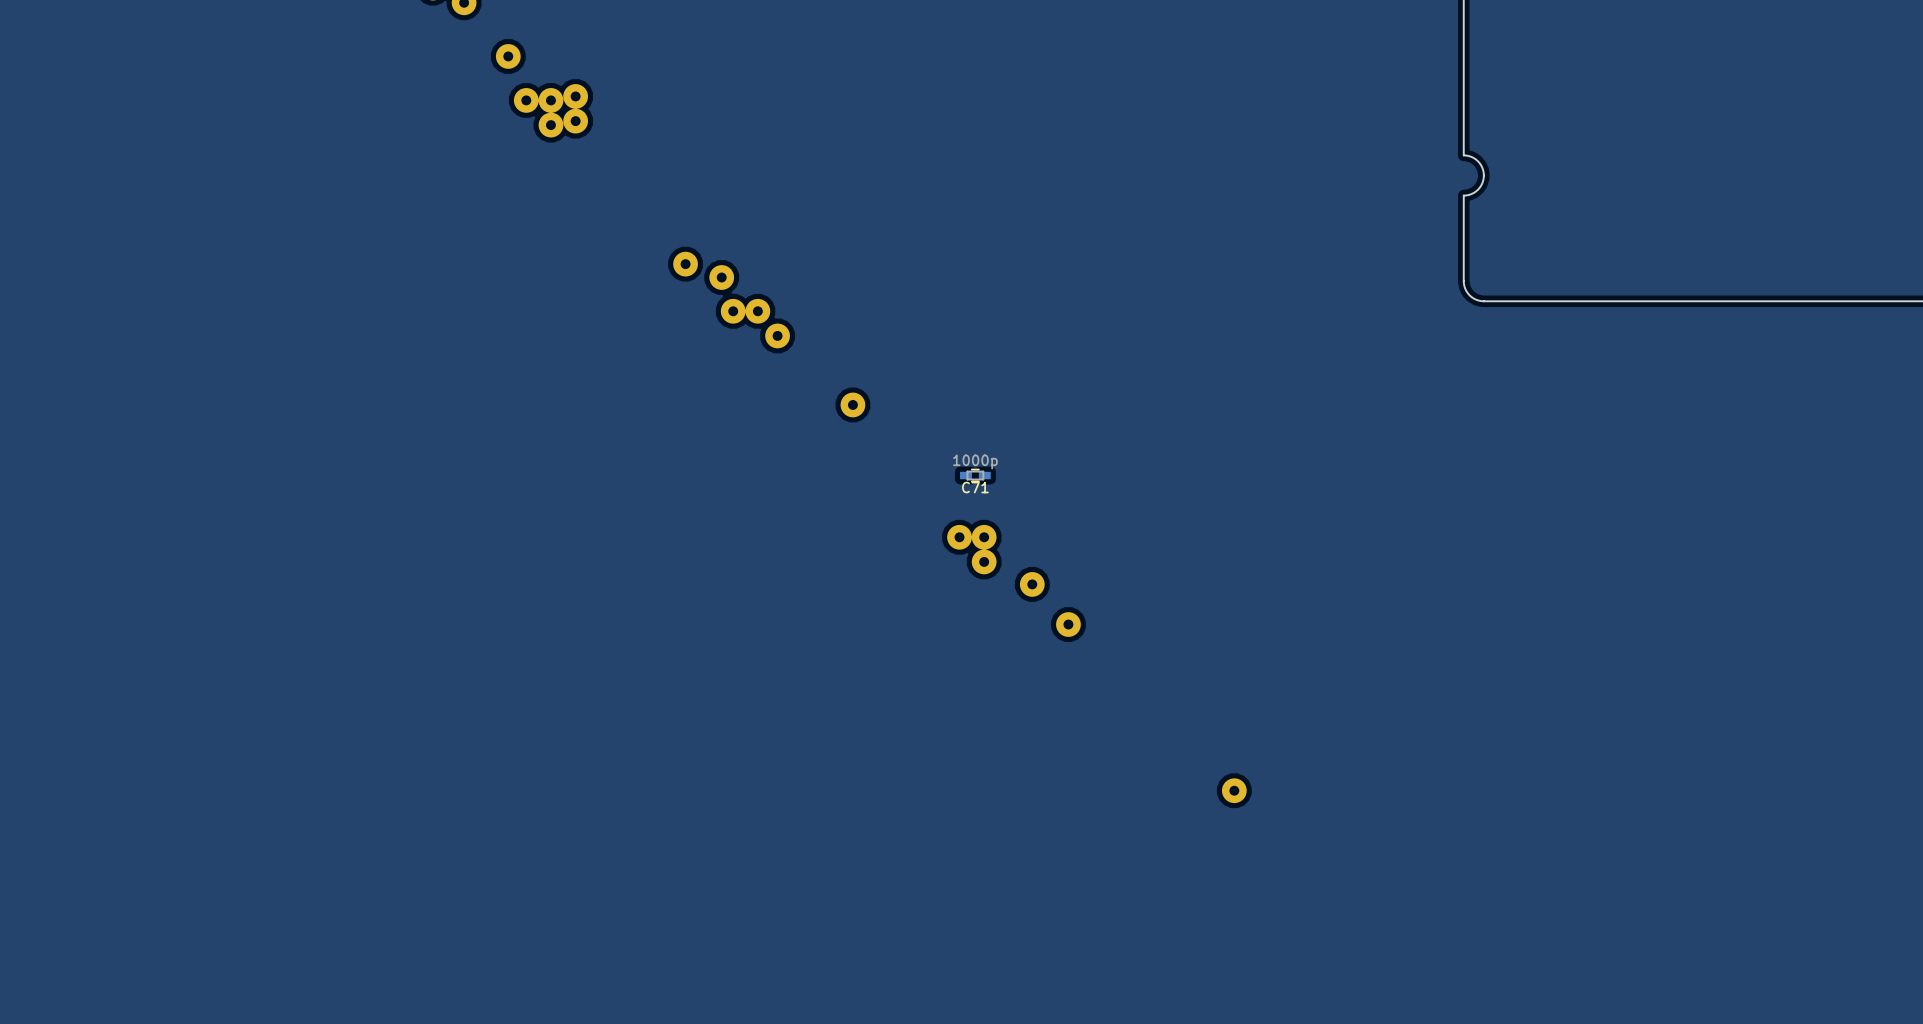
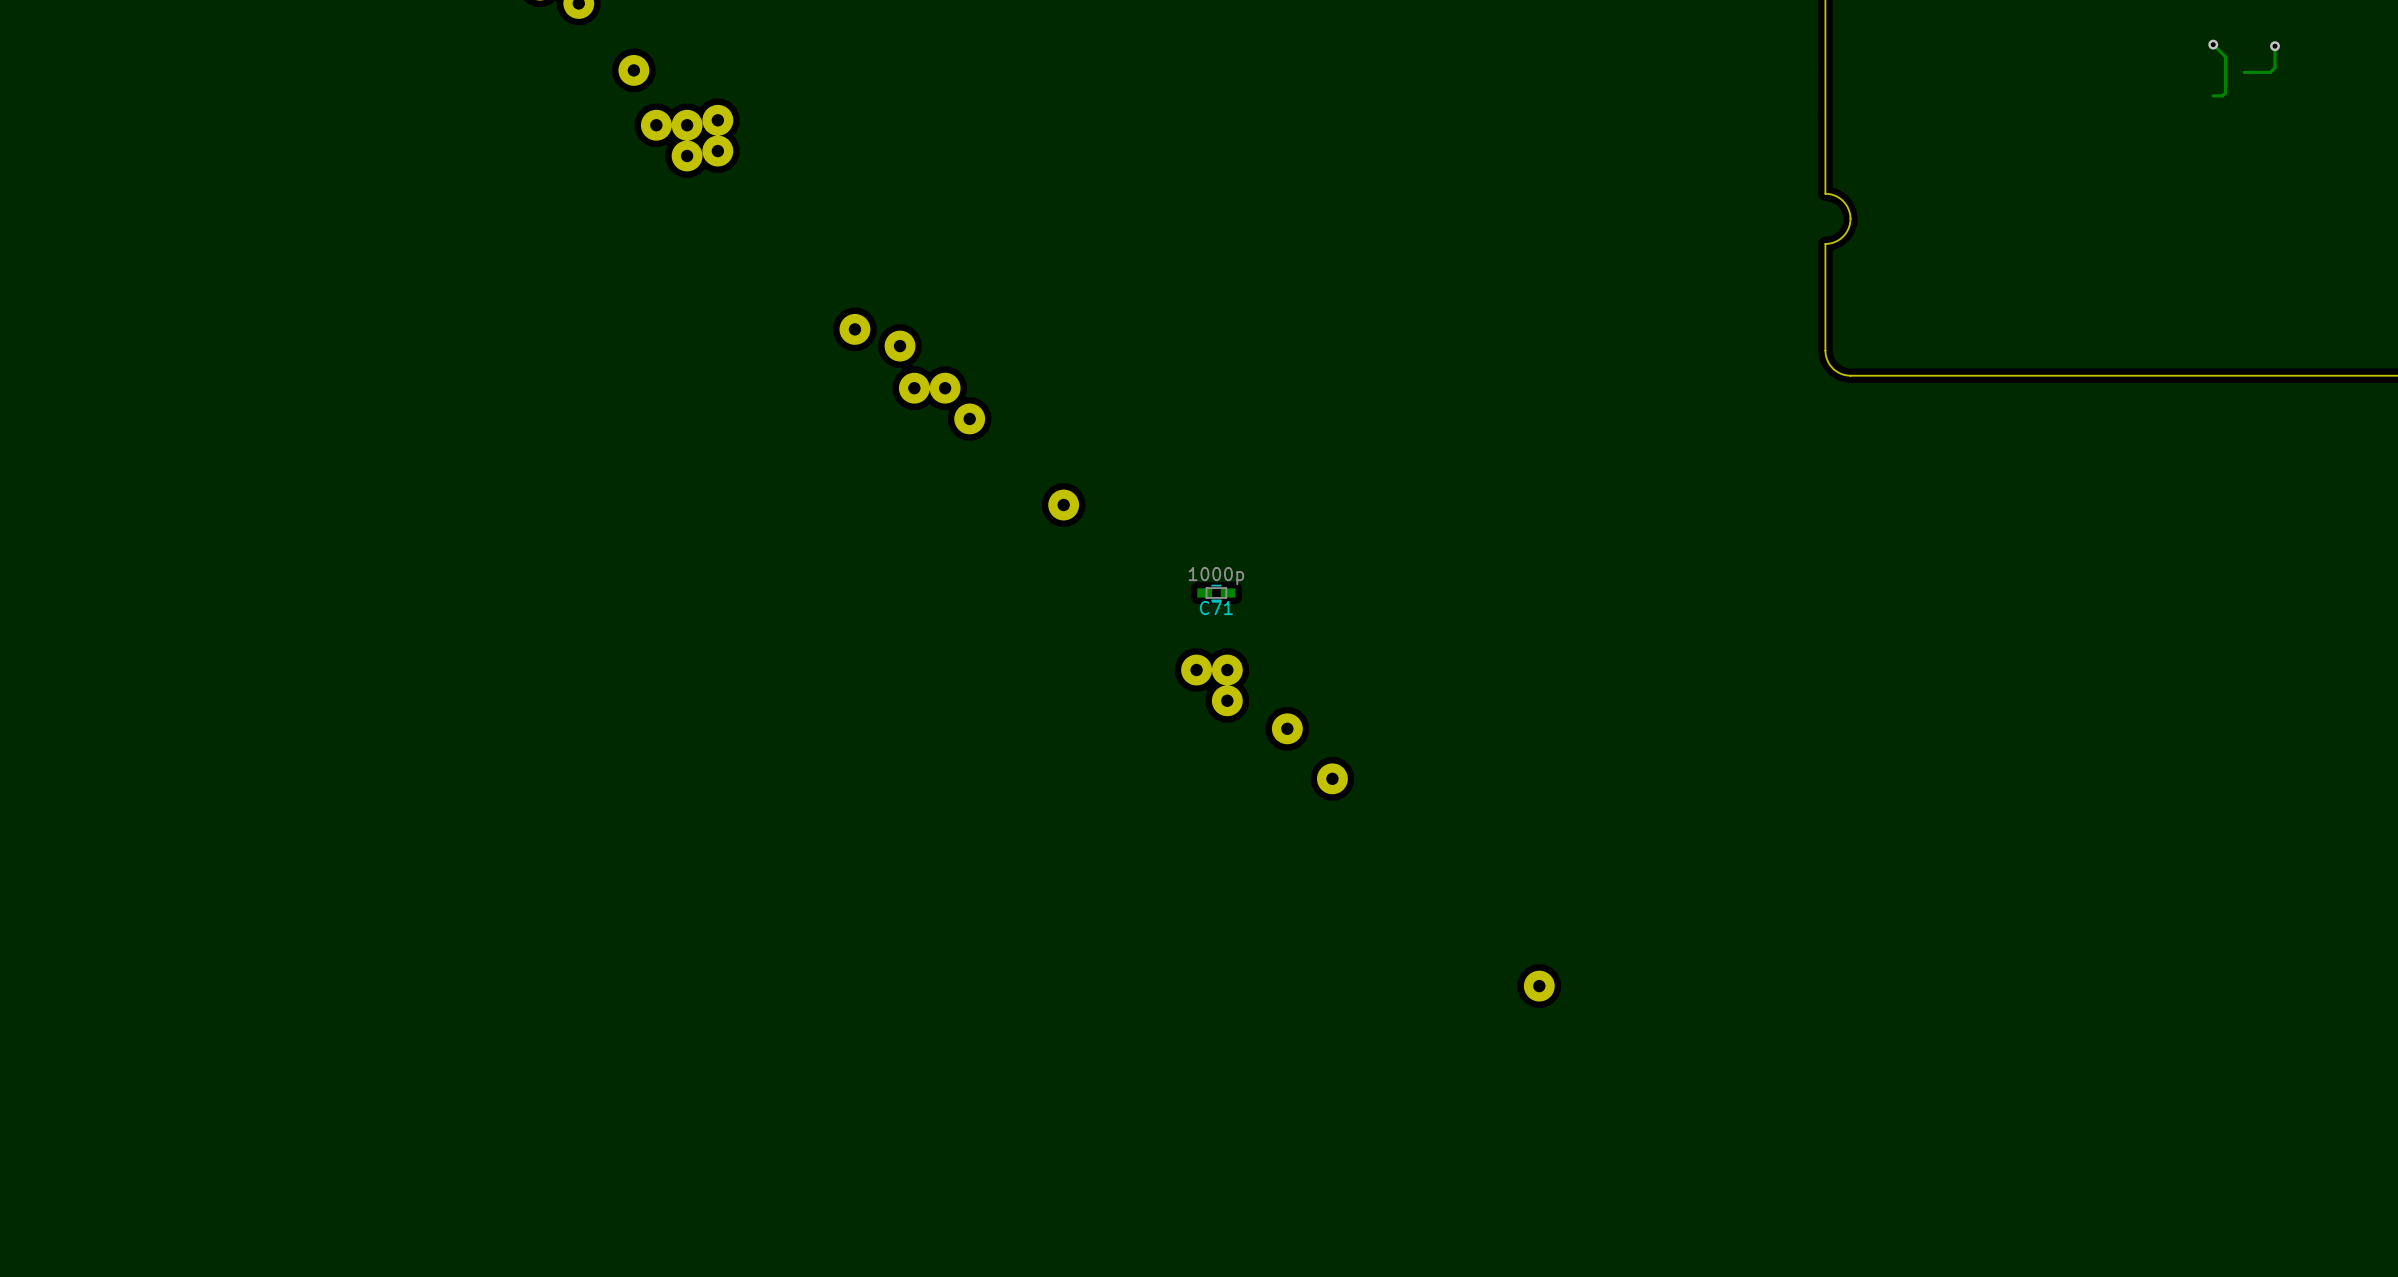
track: none -> (2213, 44) (2225, 56) (2225, 92) (2222, 95) (2213, 95)
via: none -> (2213, 44)
track: none -> (2274, 46) (2274, 67) (2270, 72) (2244, 72)
via: none -> (2274, 46)

